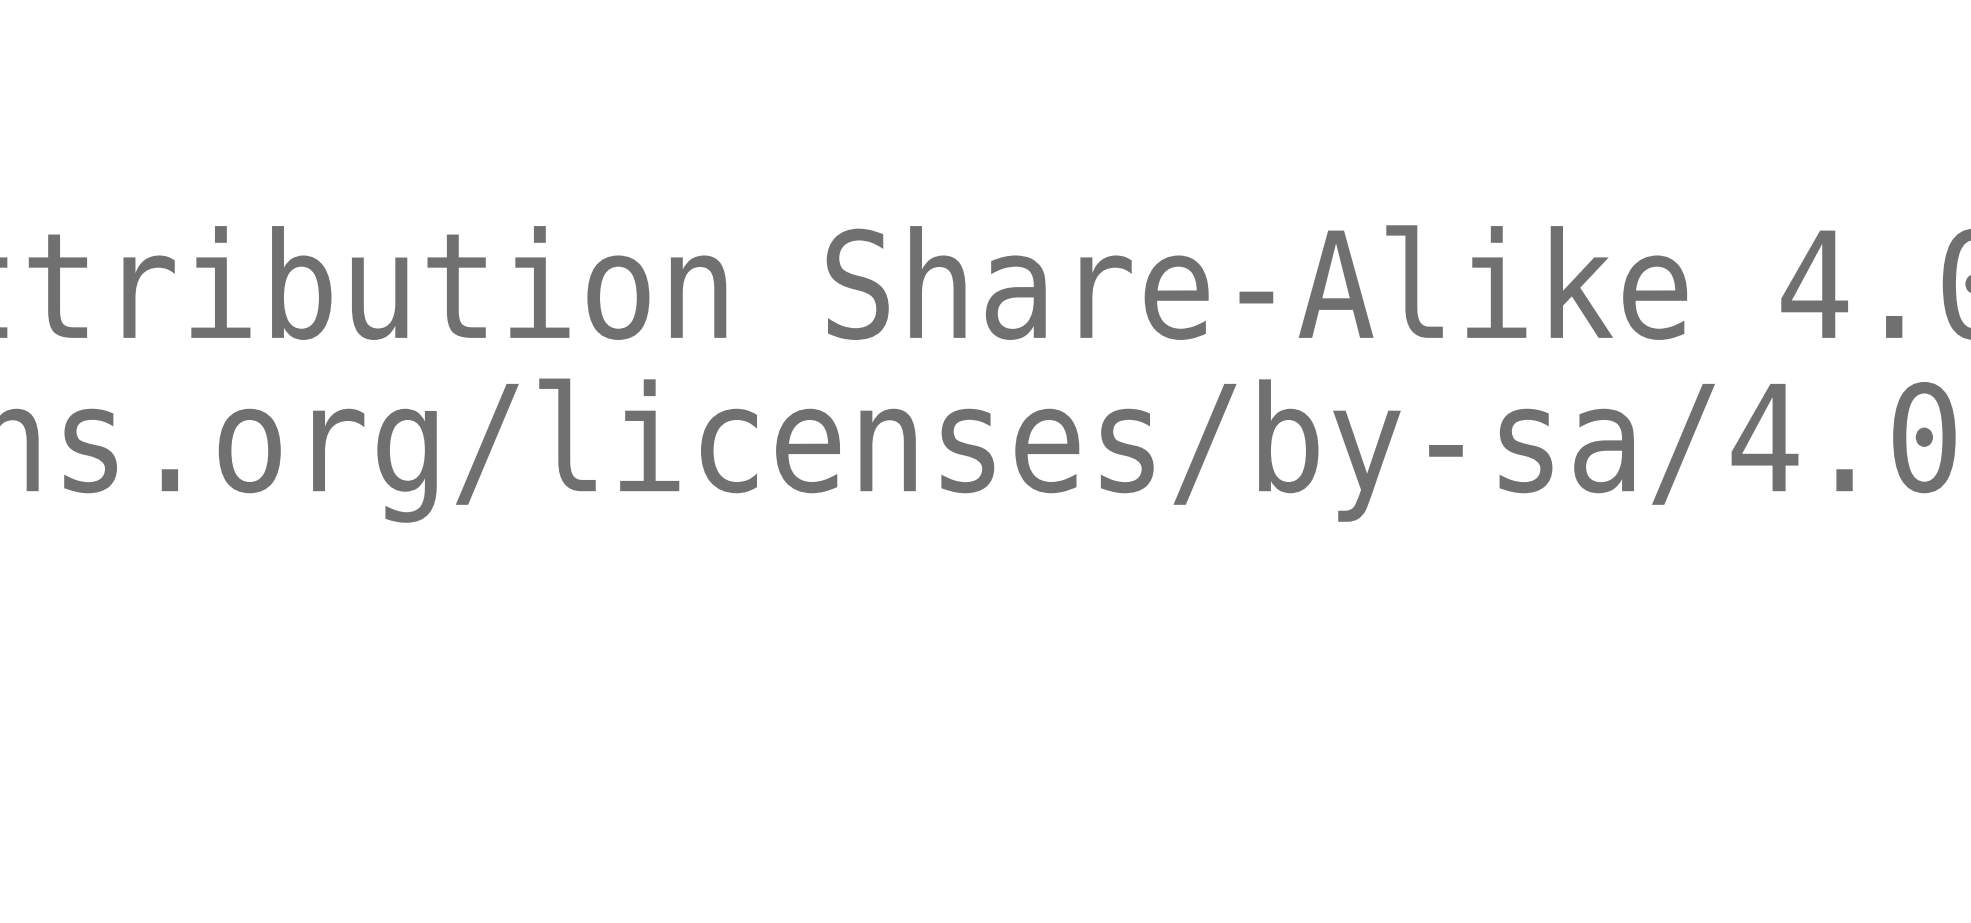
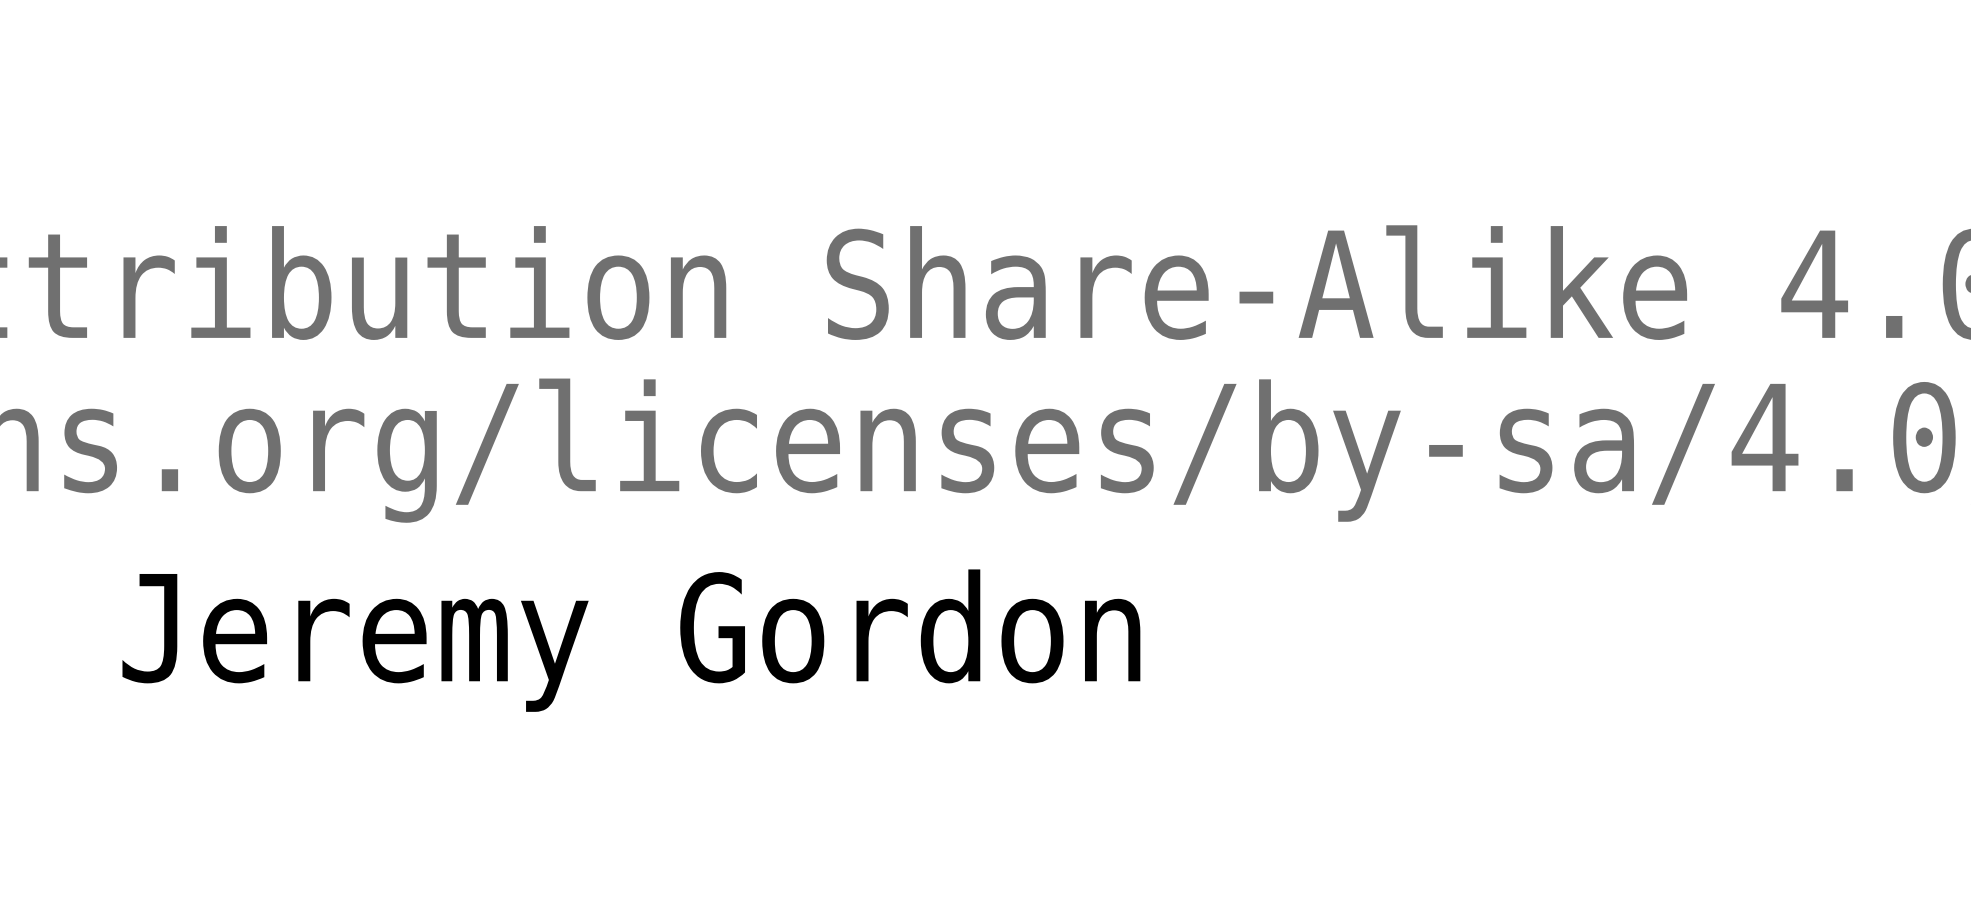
text: none -> Jeremy Gordon (631, 640)

